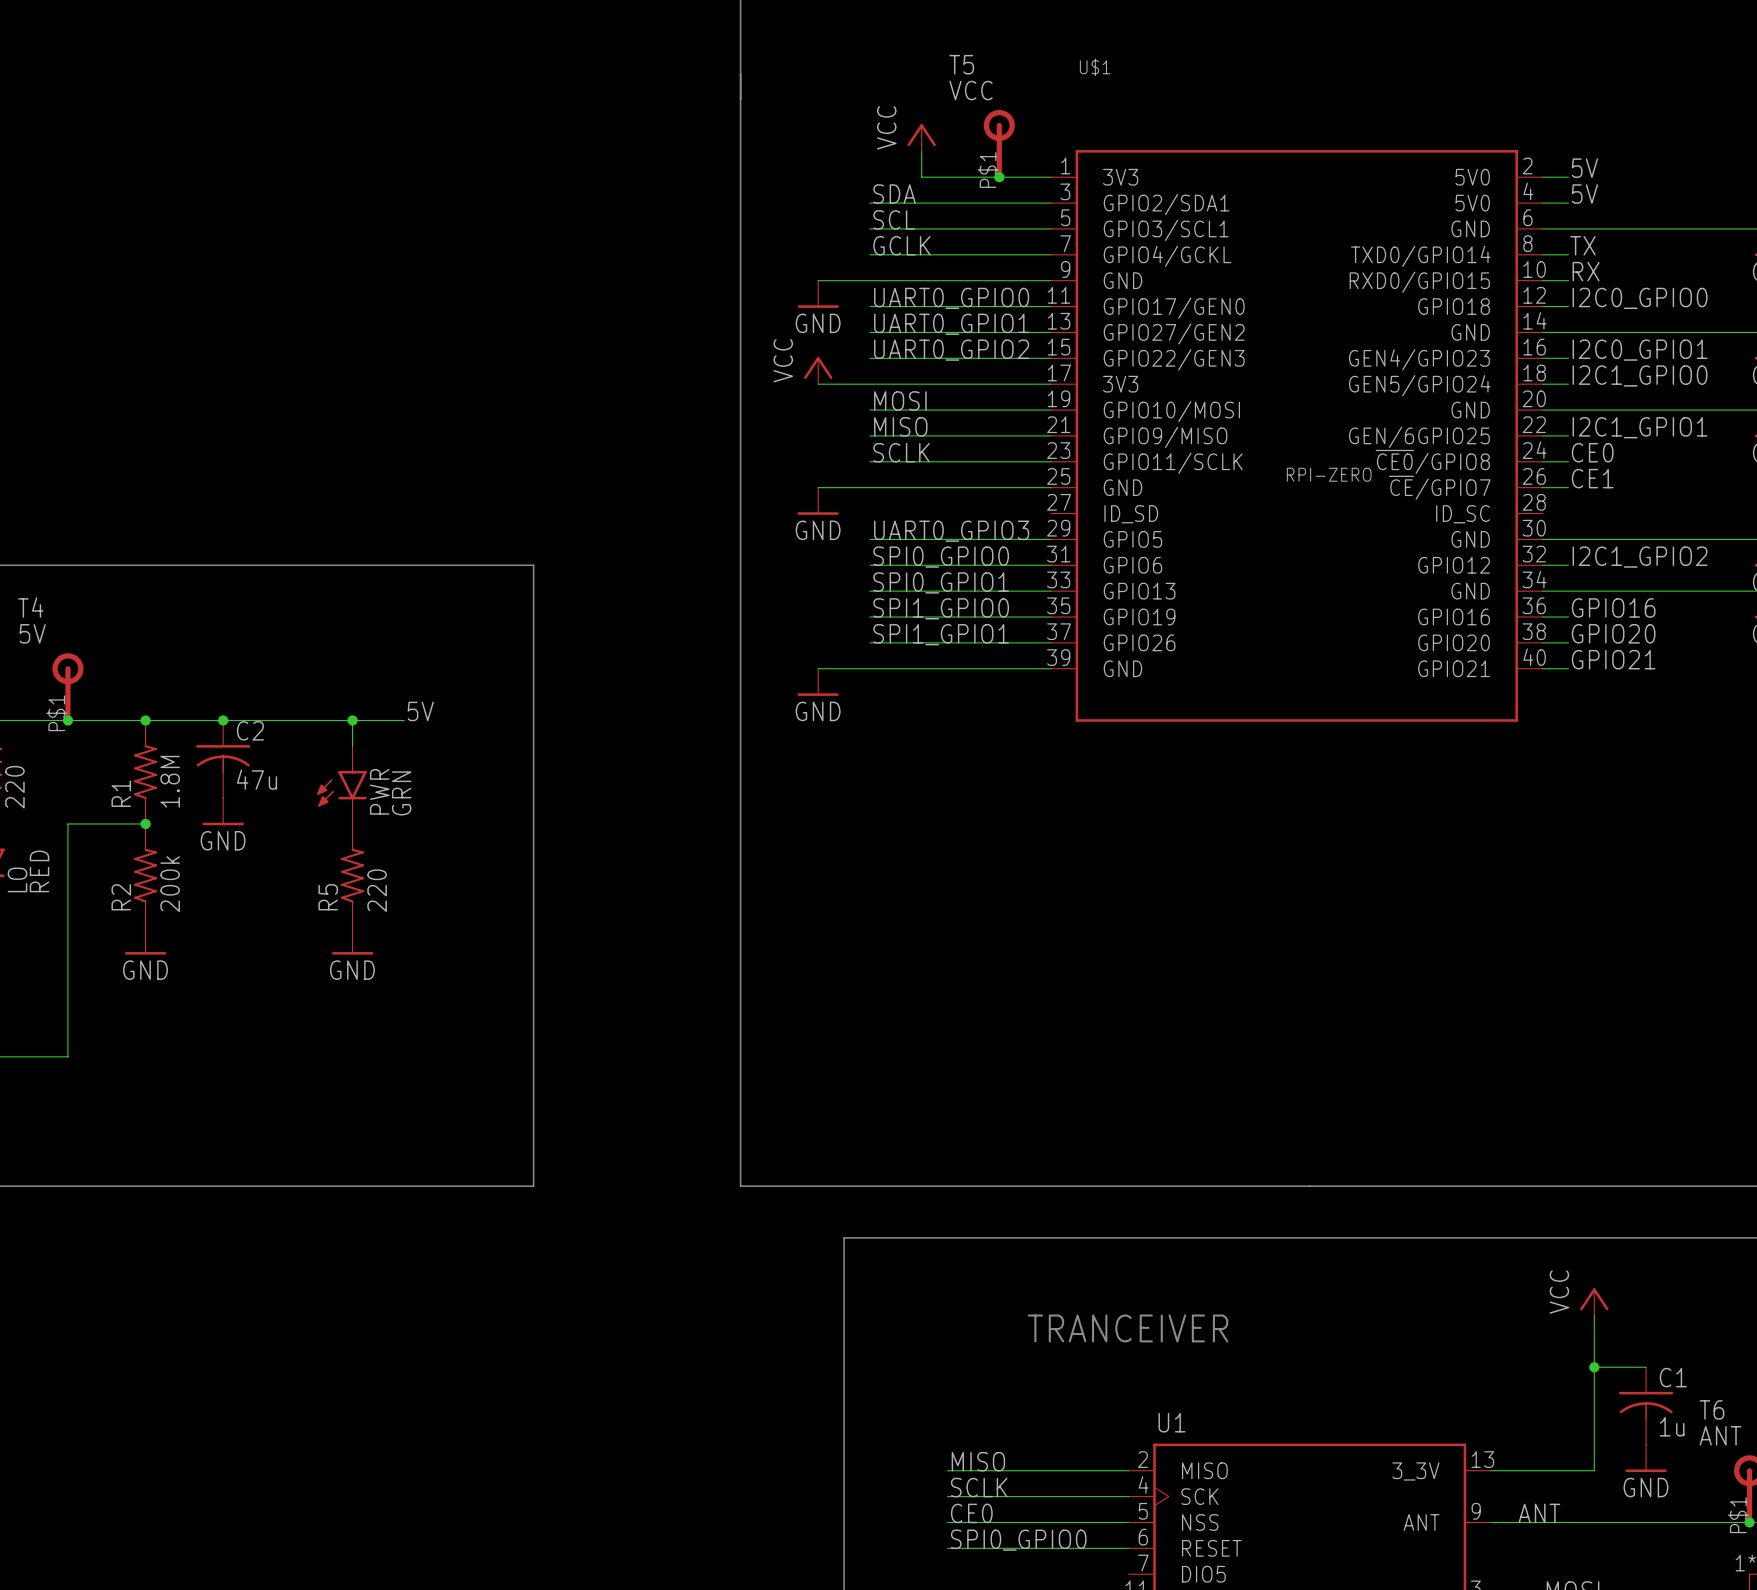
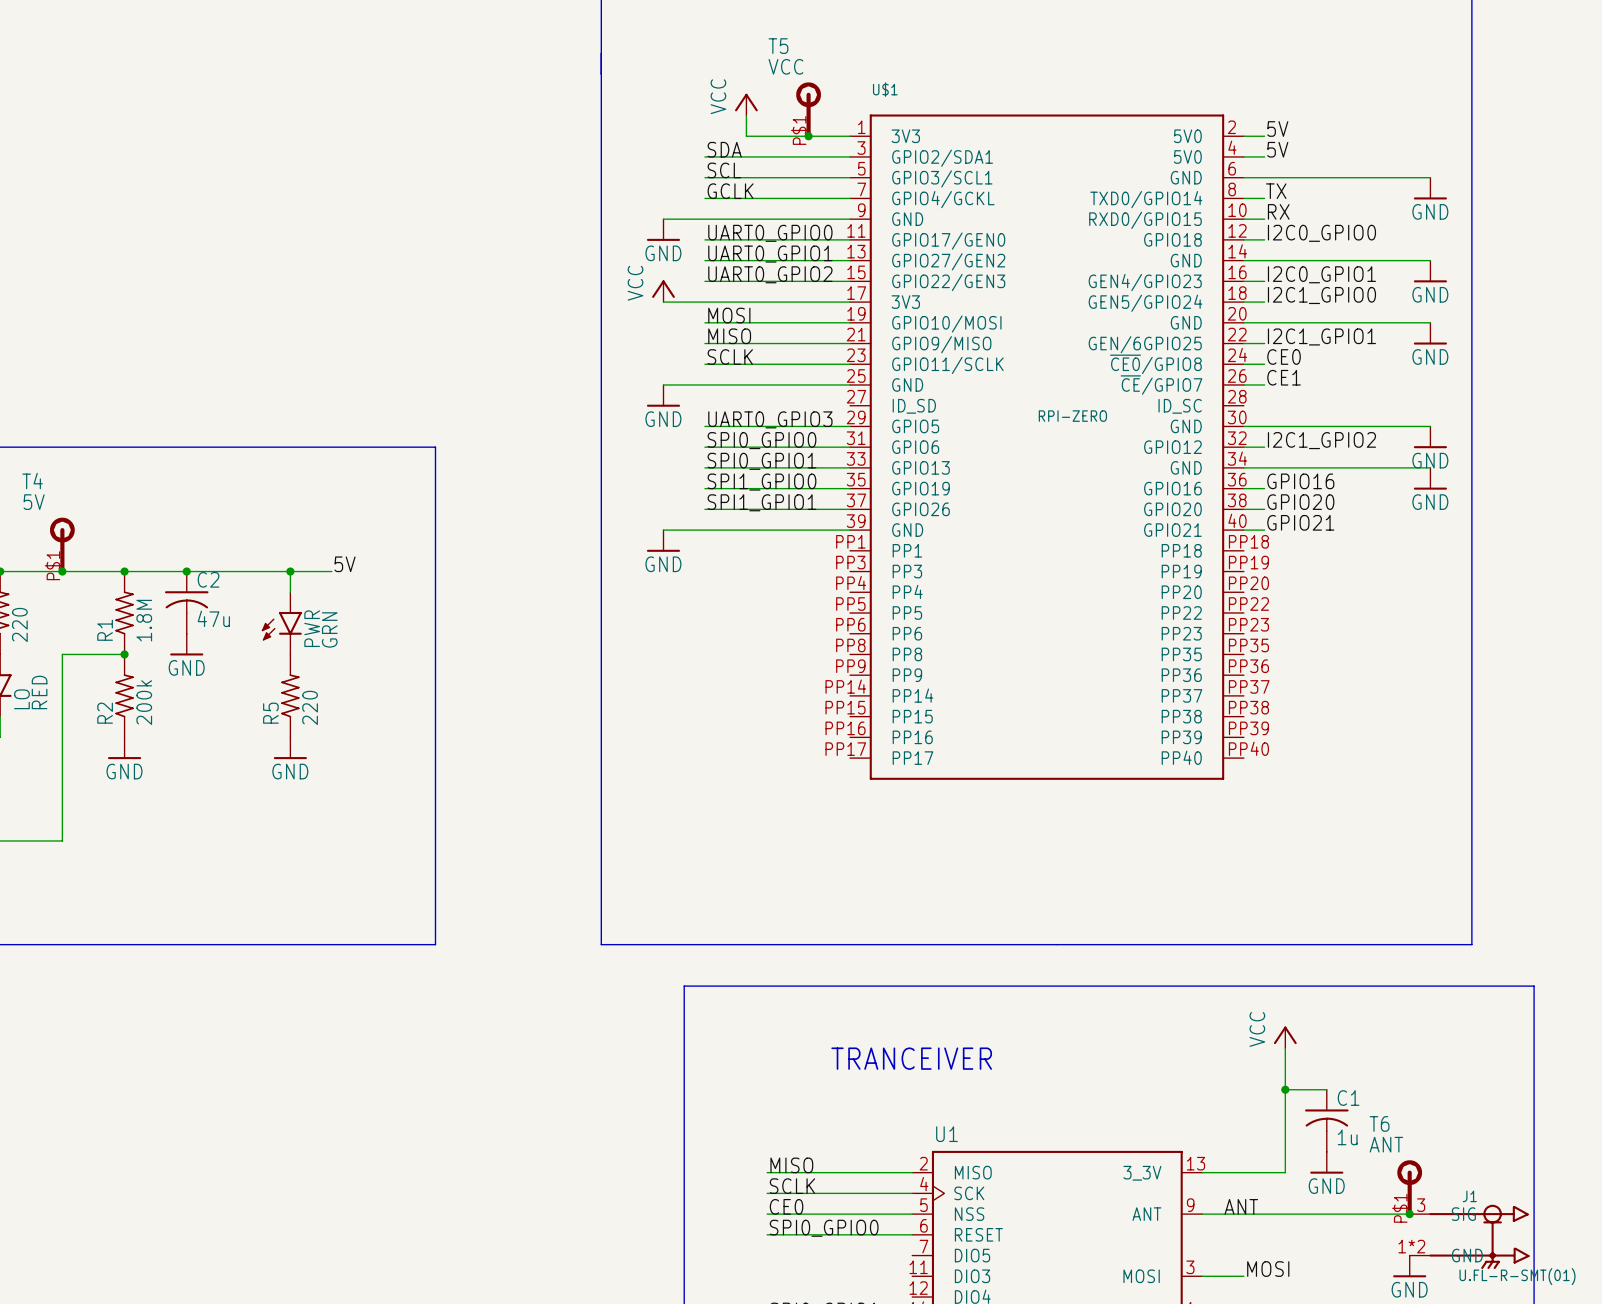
U$1 name position: U$1 (1095, 67) -> U$1 (885, 89)
U$1 symbol: [1051, 150, 1543, 722] -> [850, 114, 1244, 780]
U$1 value position: RPI-ZERO (1329, 474) -> RPI-ZERO (1072, 416)

